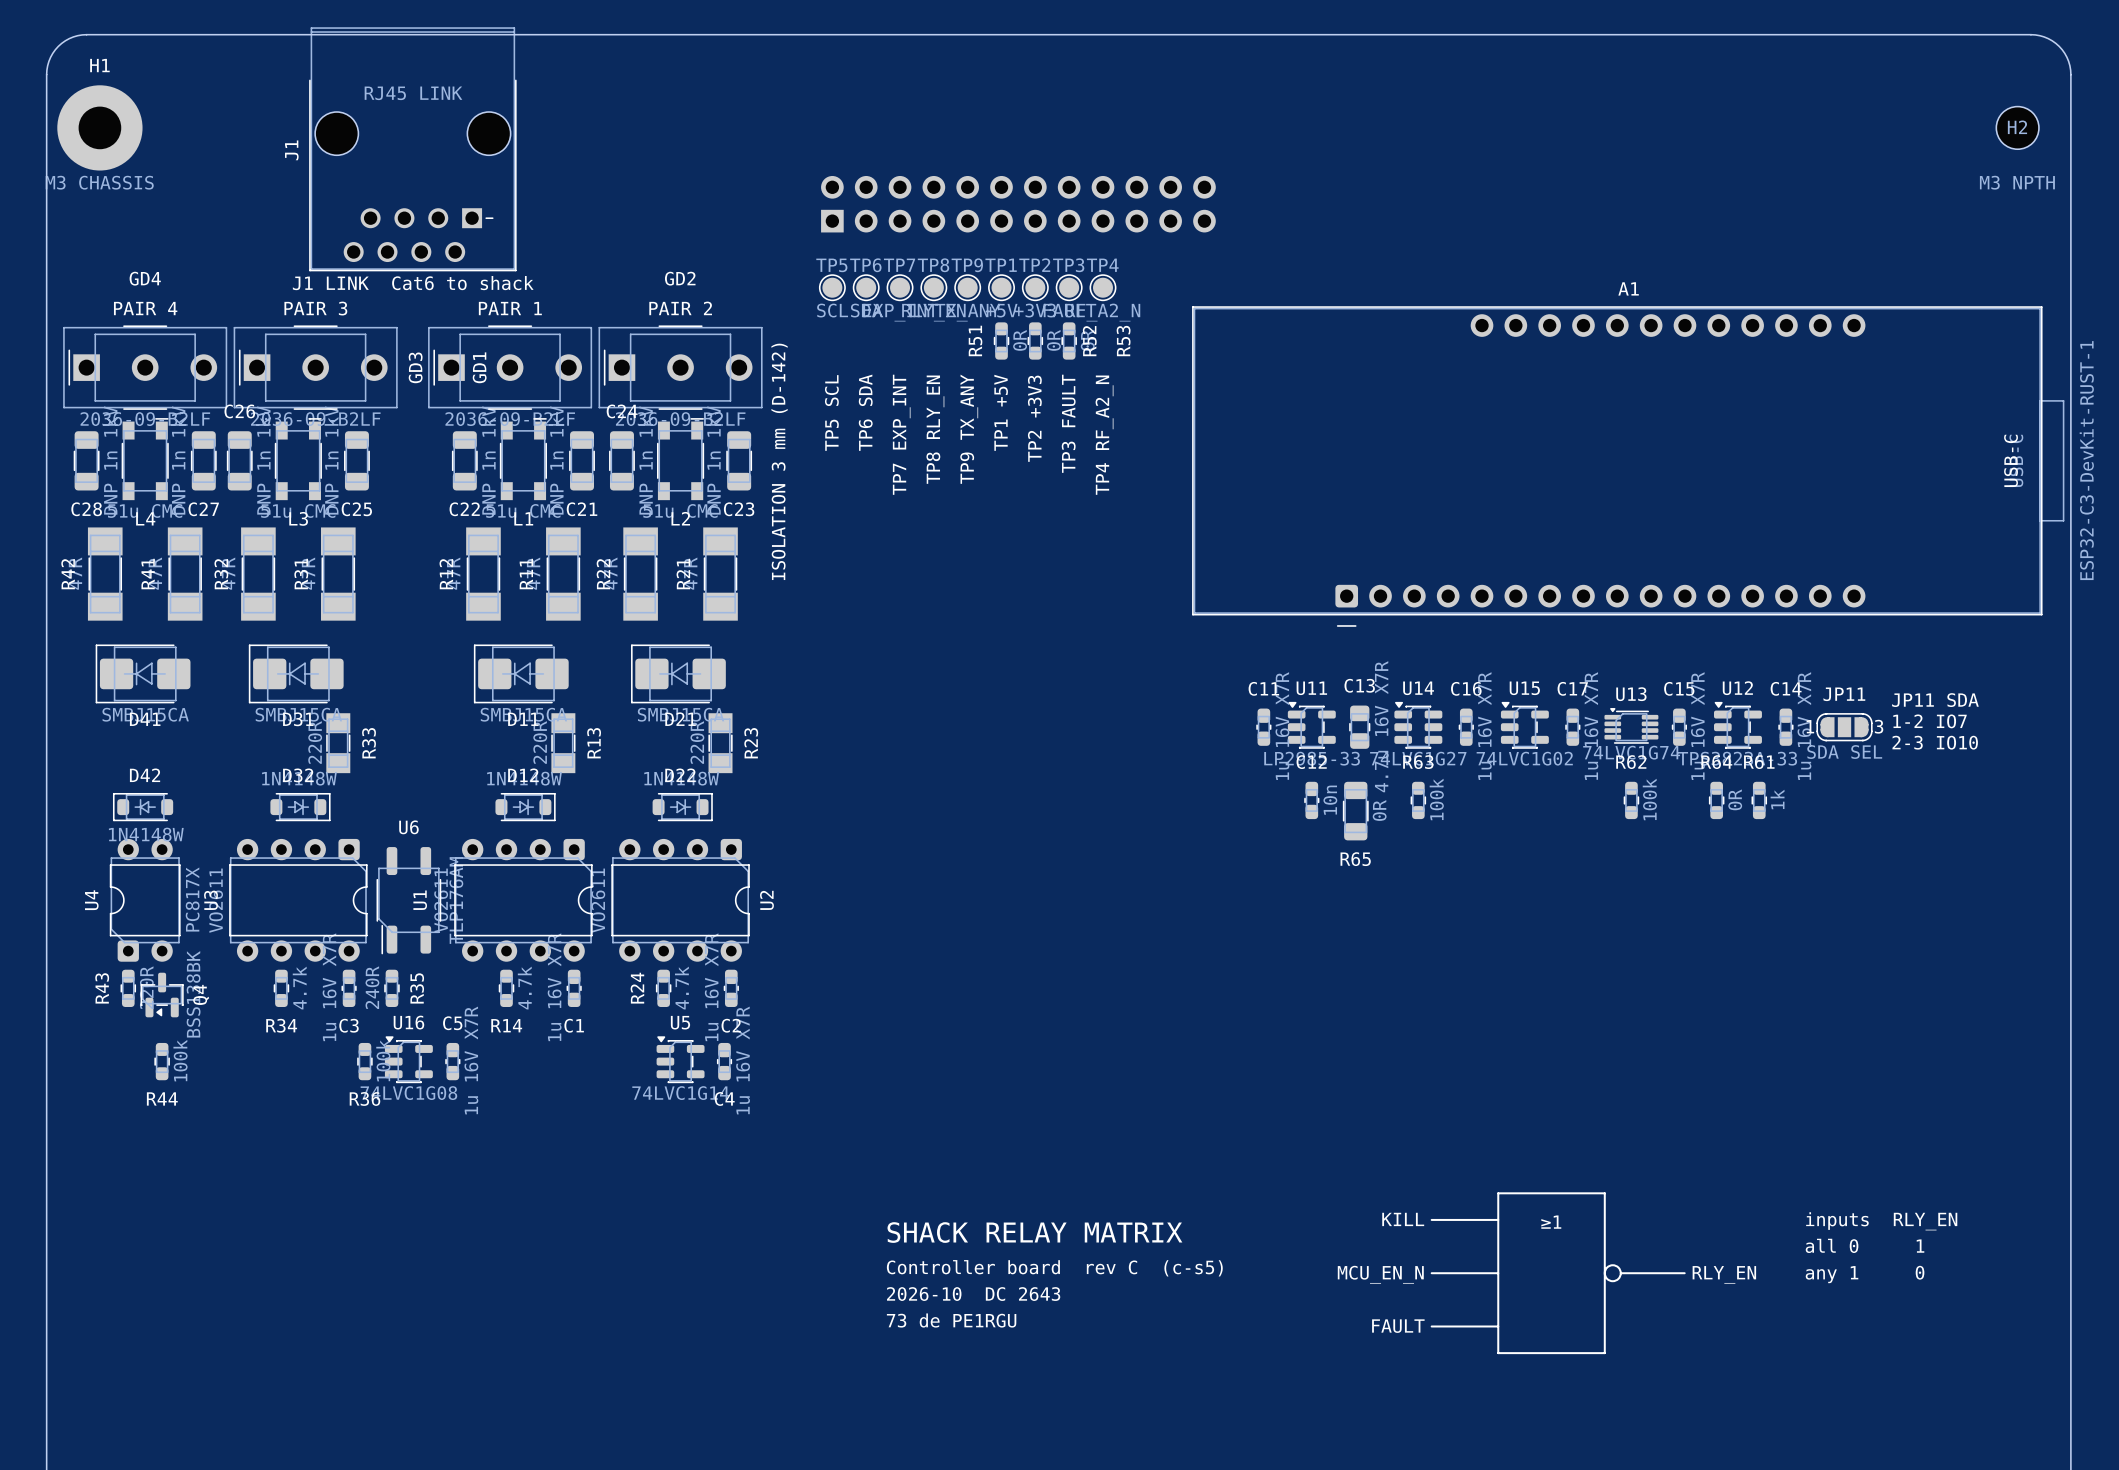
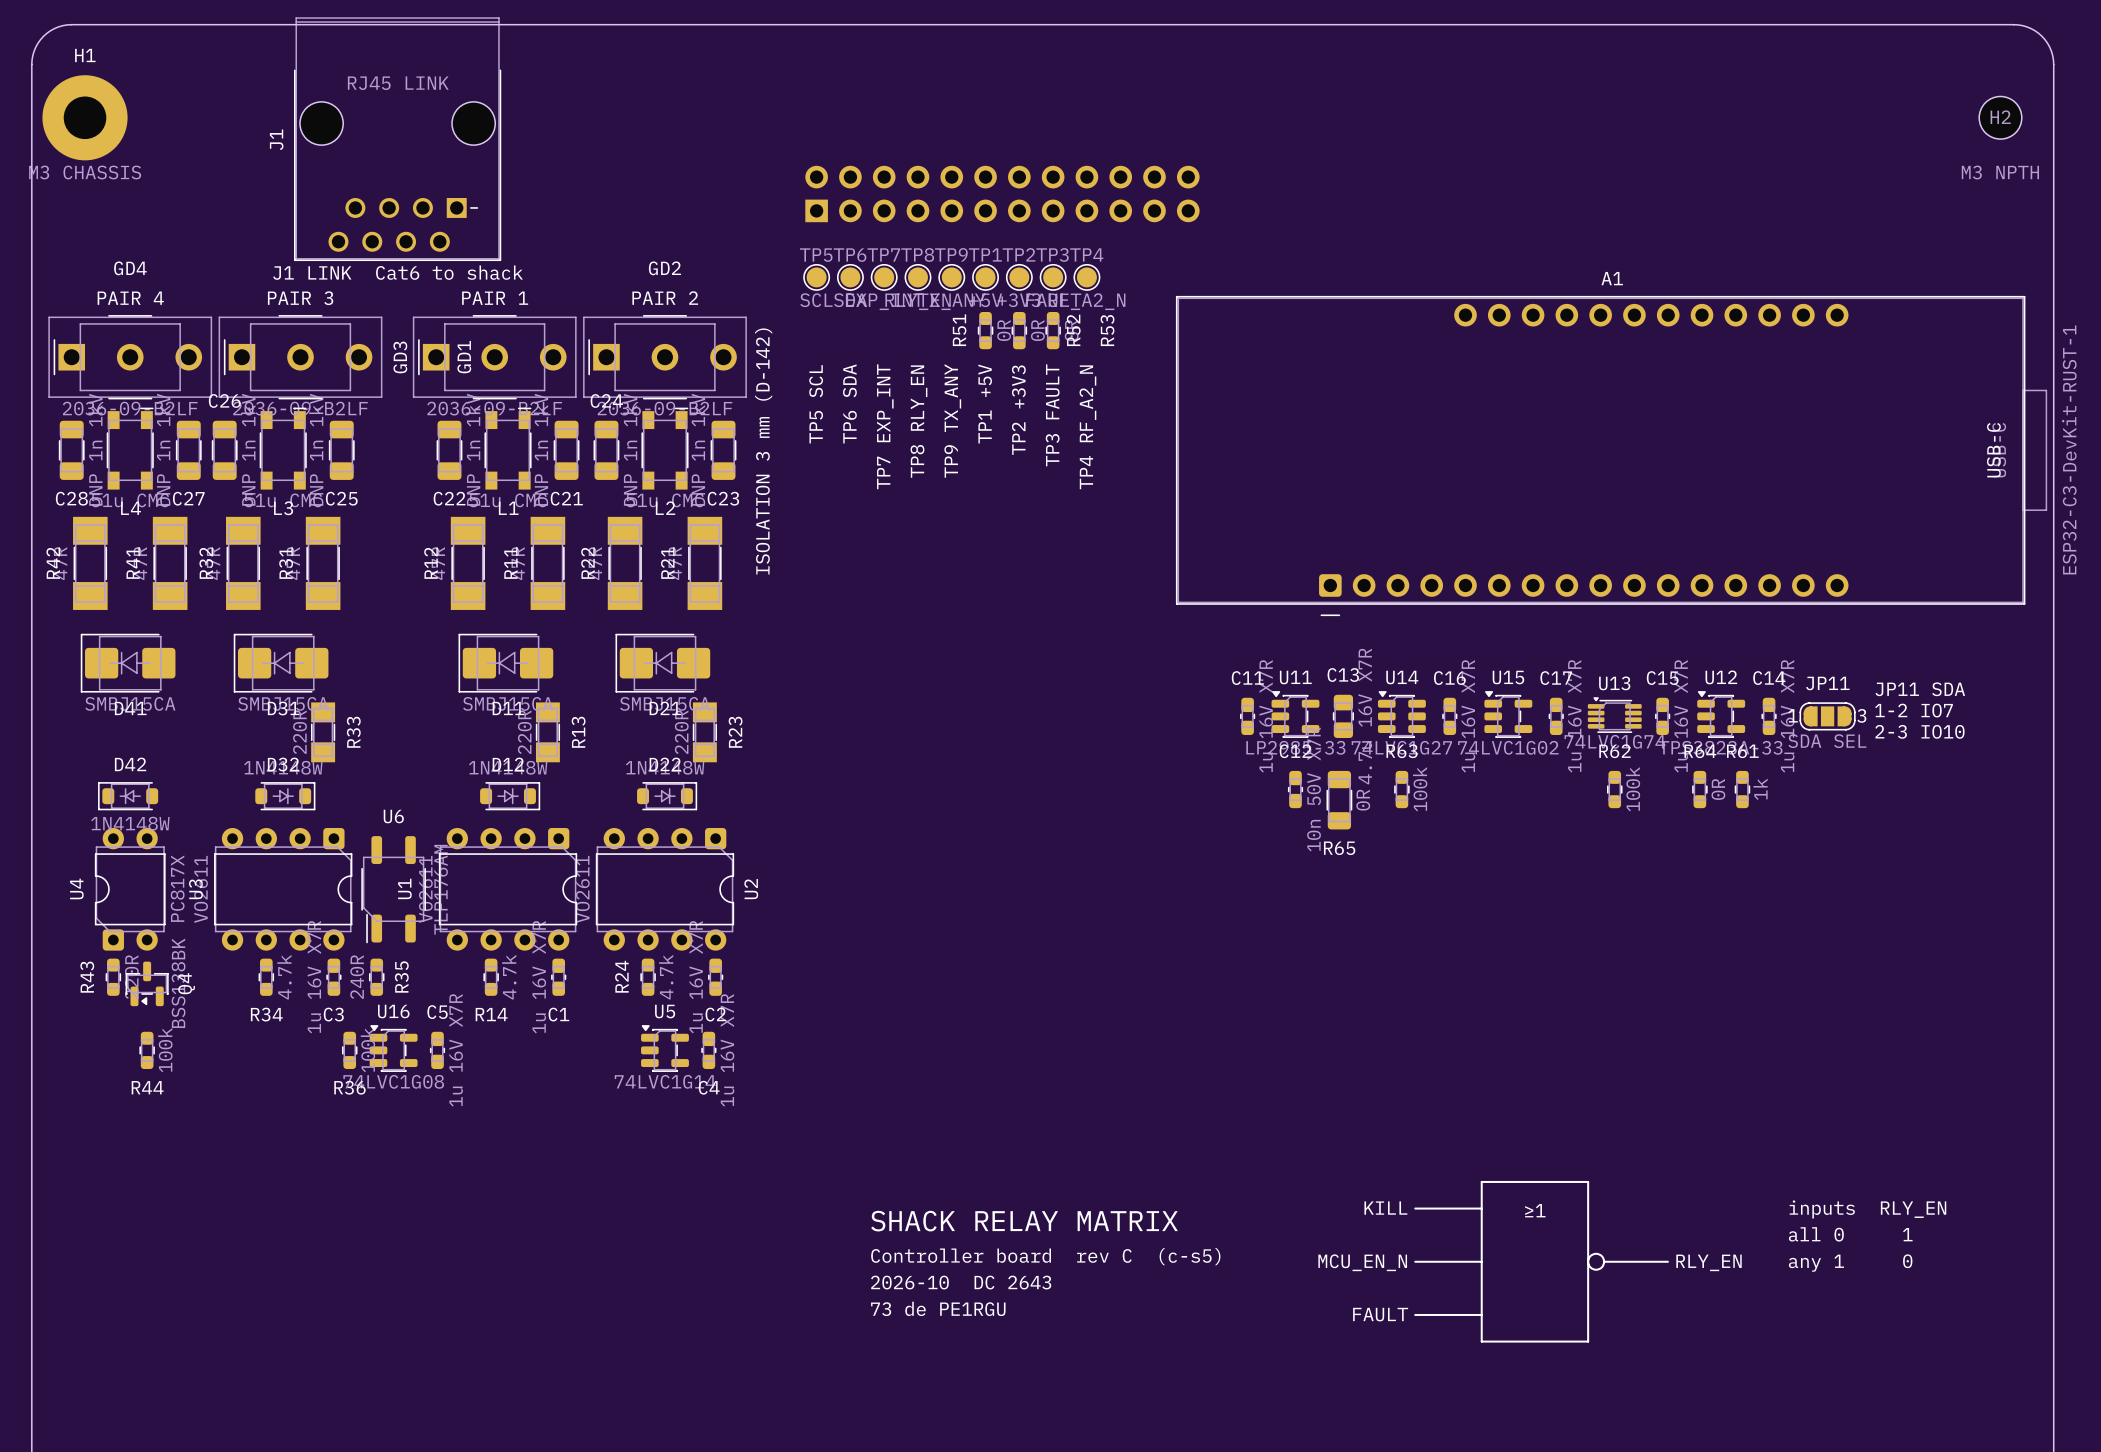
C12 value: 10n (1330, 800) -> 10n 50V X7R (1314, 789)

